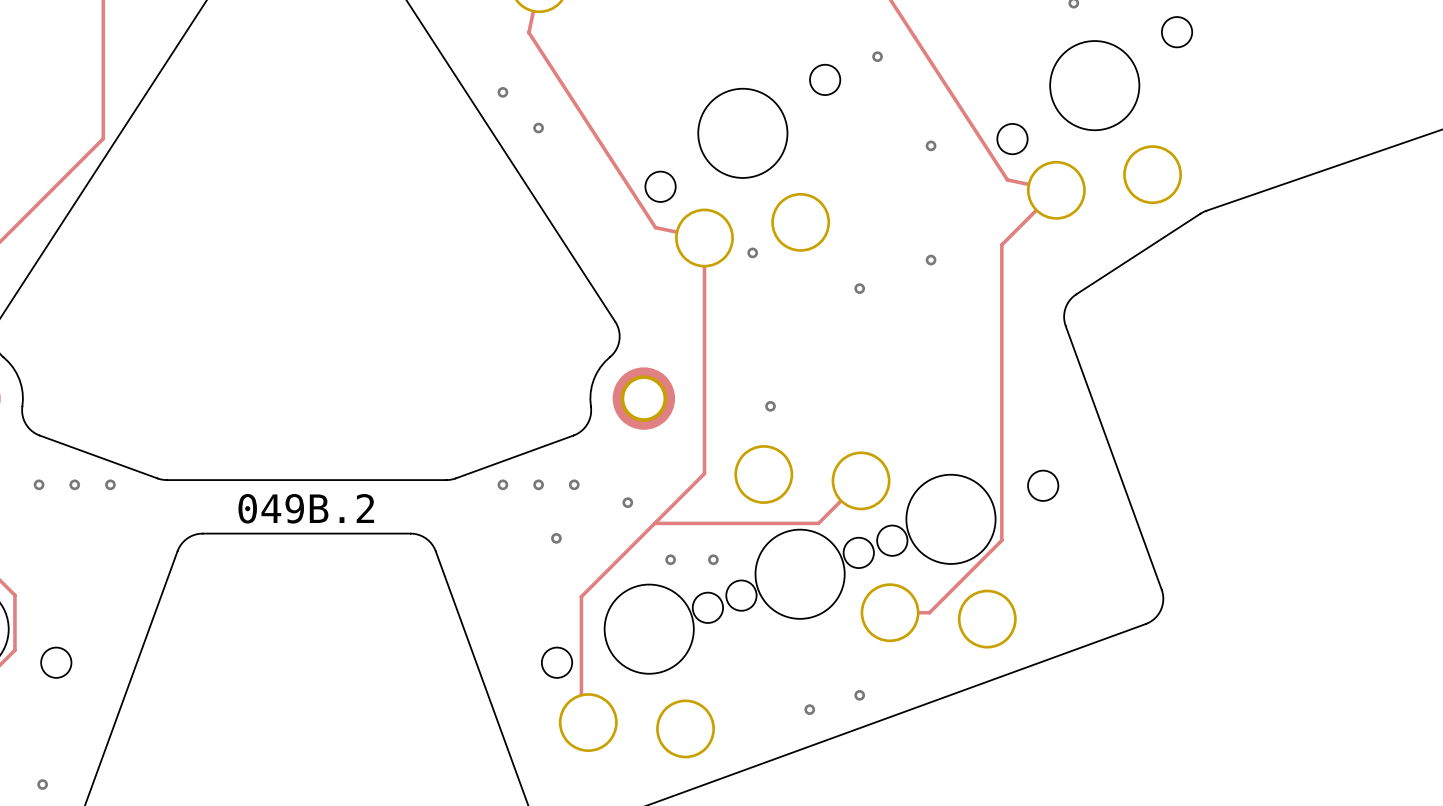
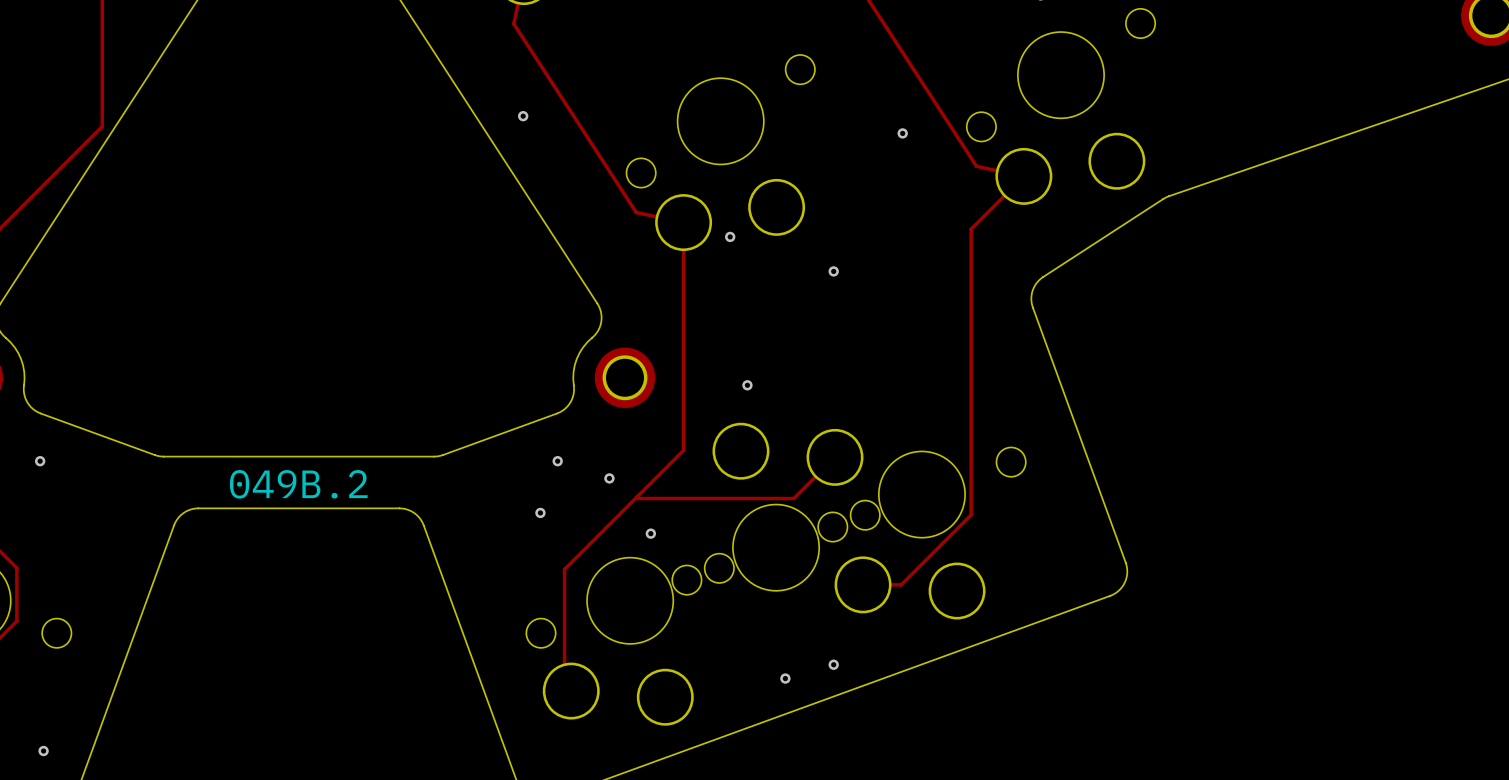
via: (877, 56) -> none
via: (502, 92) -> none
via: (931, 260) -> none
via: (74, 484) -> none
via: (110, 484) -> none
via: (502, 484) -> none
via: (538, 484) -> none
via: (713, 559) -> none

